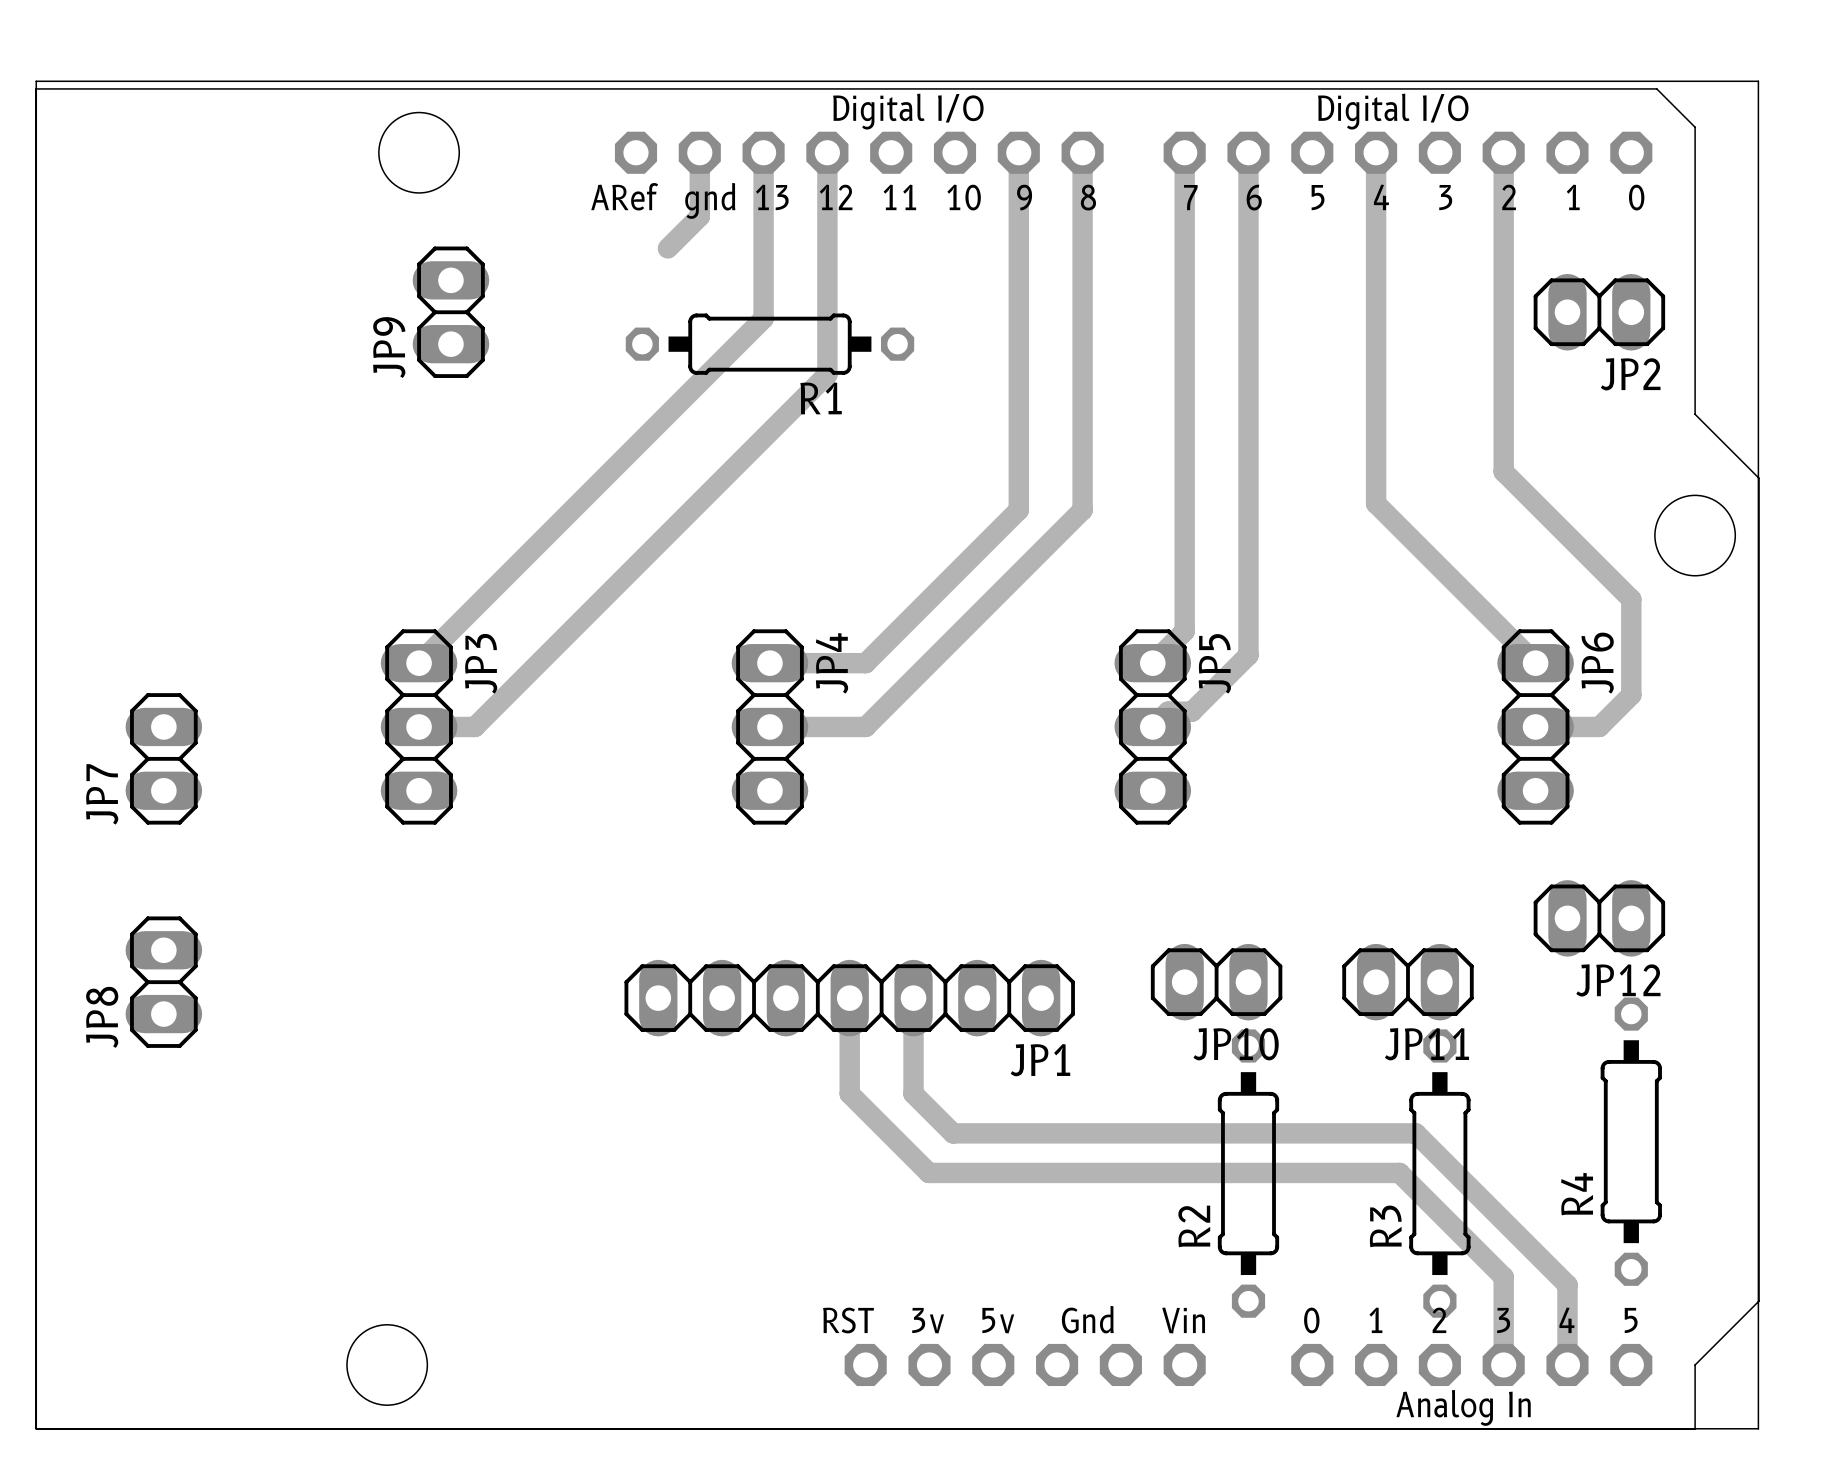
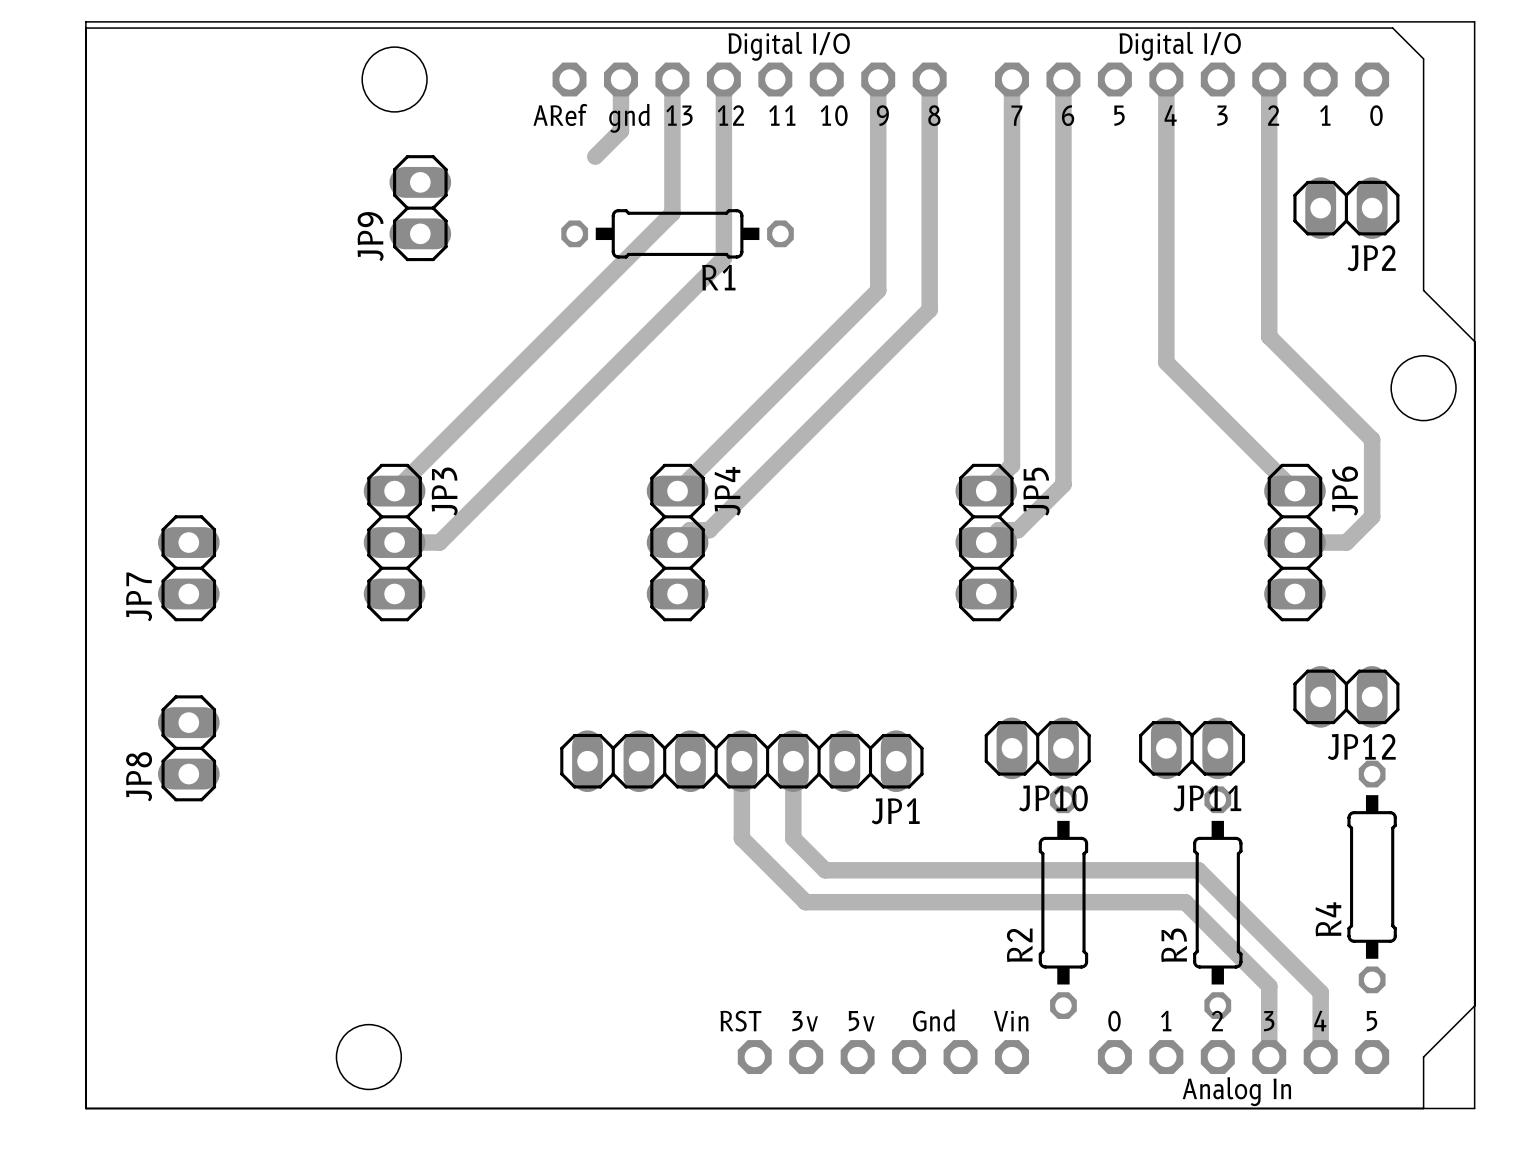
track: (1018, 414) (1018, 510) (865, 663) (769, 663) -> (878, 290) (677, 491)
track: (1082, 438) (1082, 510) (865, 726) (769, 726) -> (929, 309) (709, 530) (689, 530) (677, 542)

